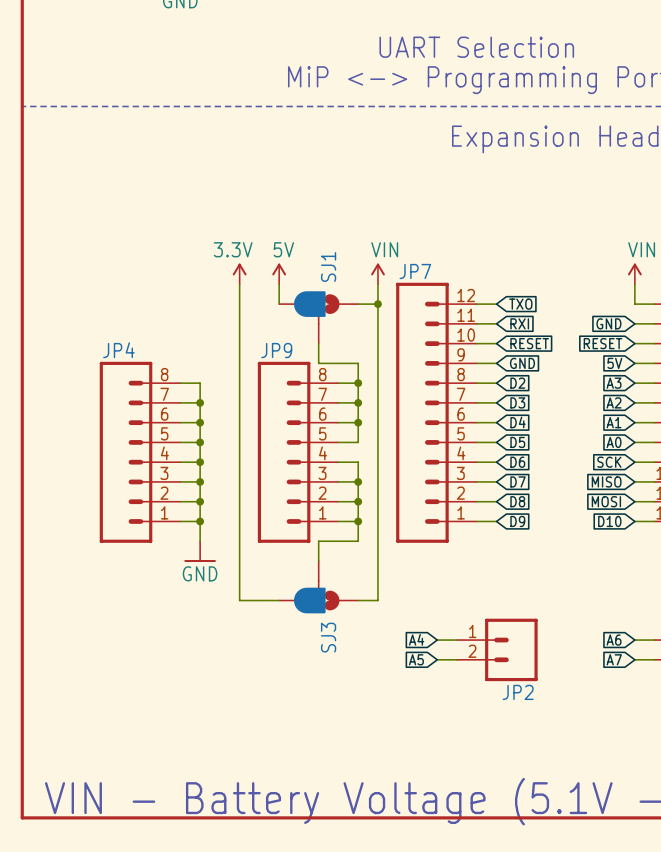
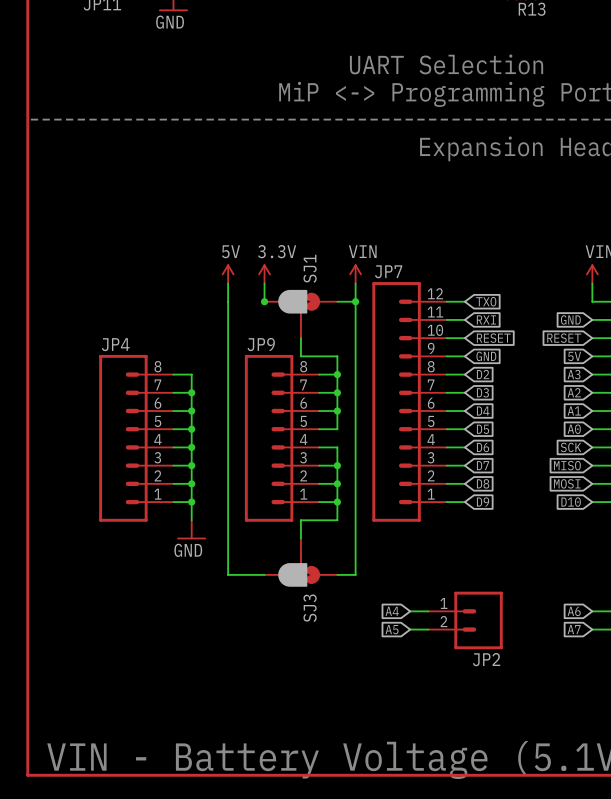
power symbol: 3.3V (239, 273) -> 5V (228, 273)
power symbol: 5V (279, 273) -> 3.3V (264, 273)
junction: none -> (264, 301)

